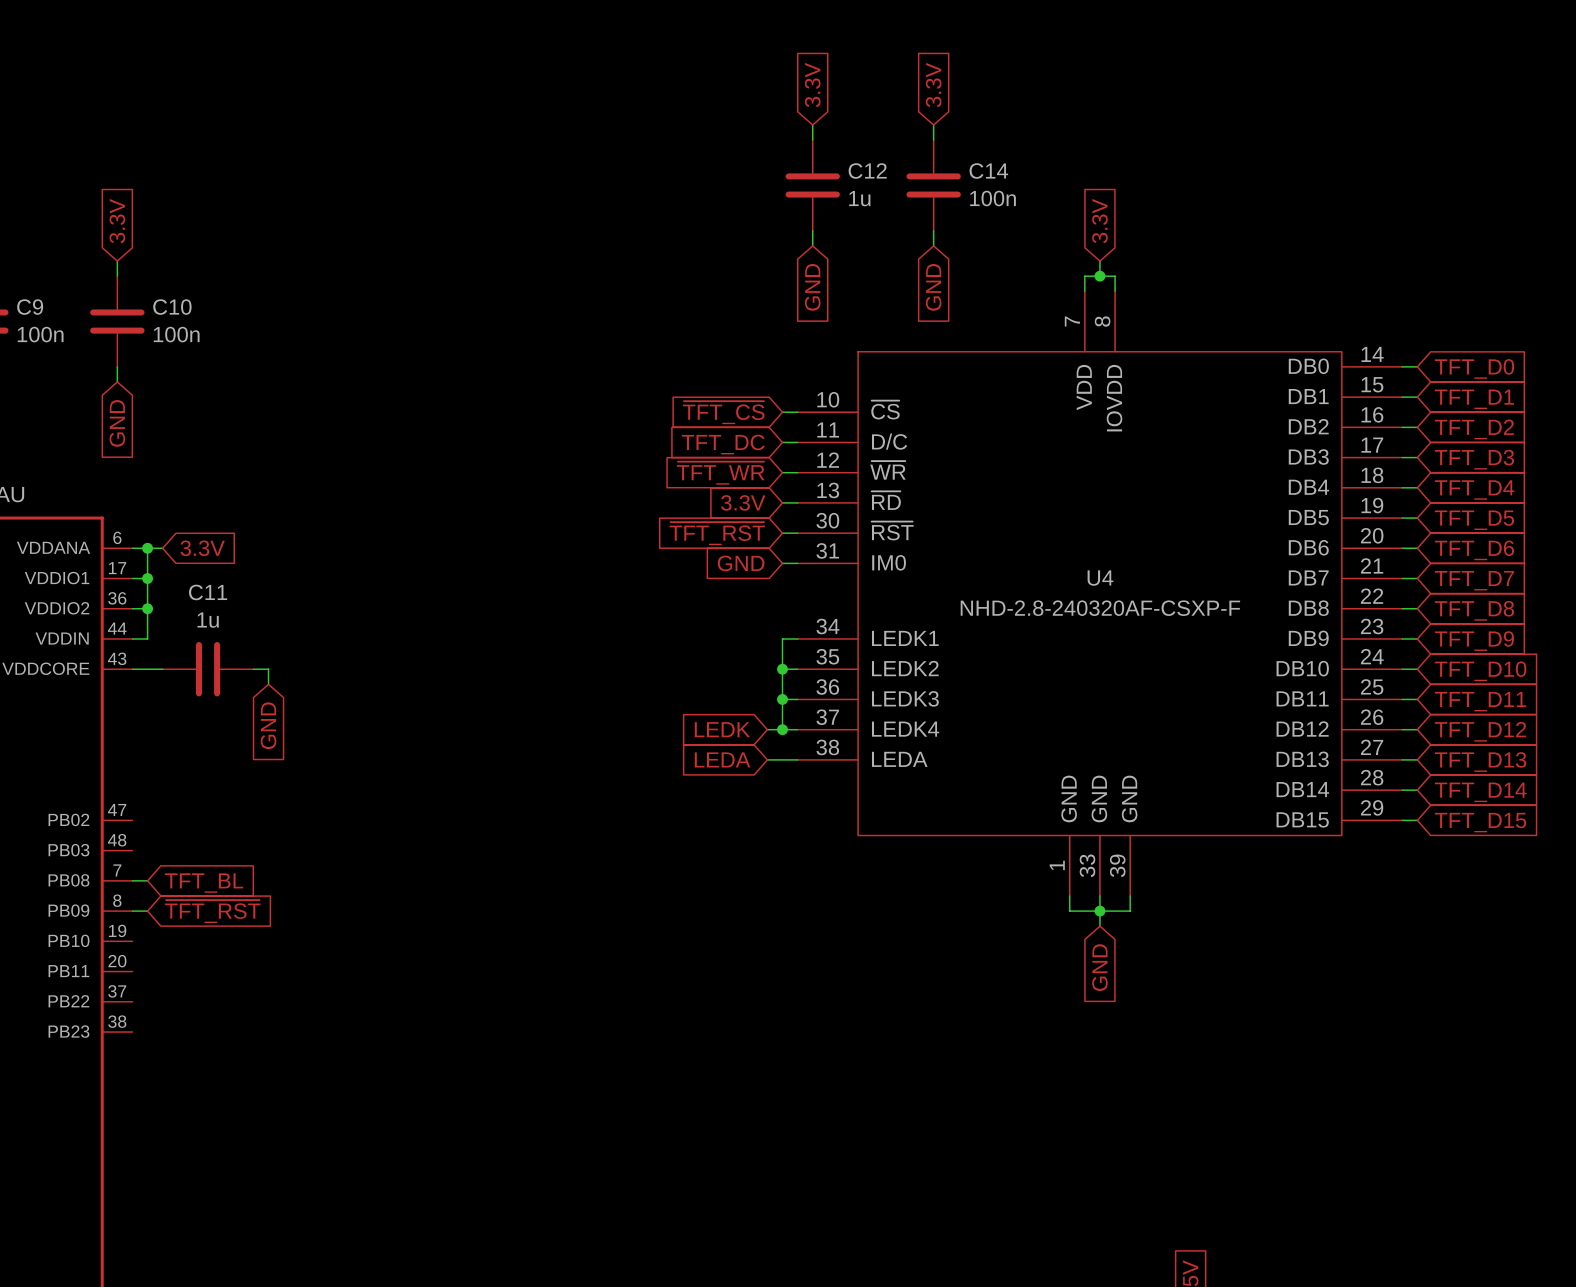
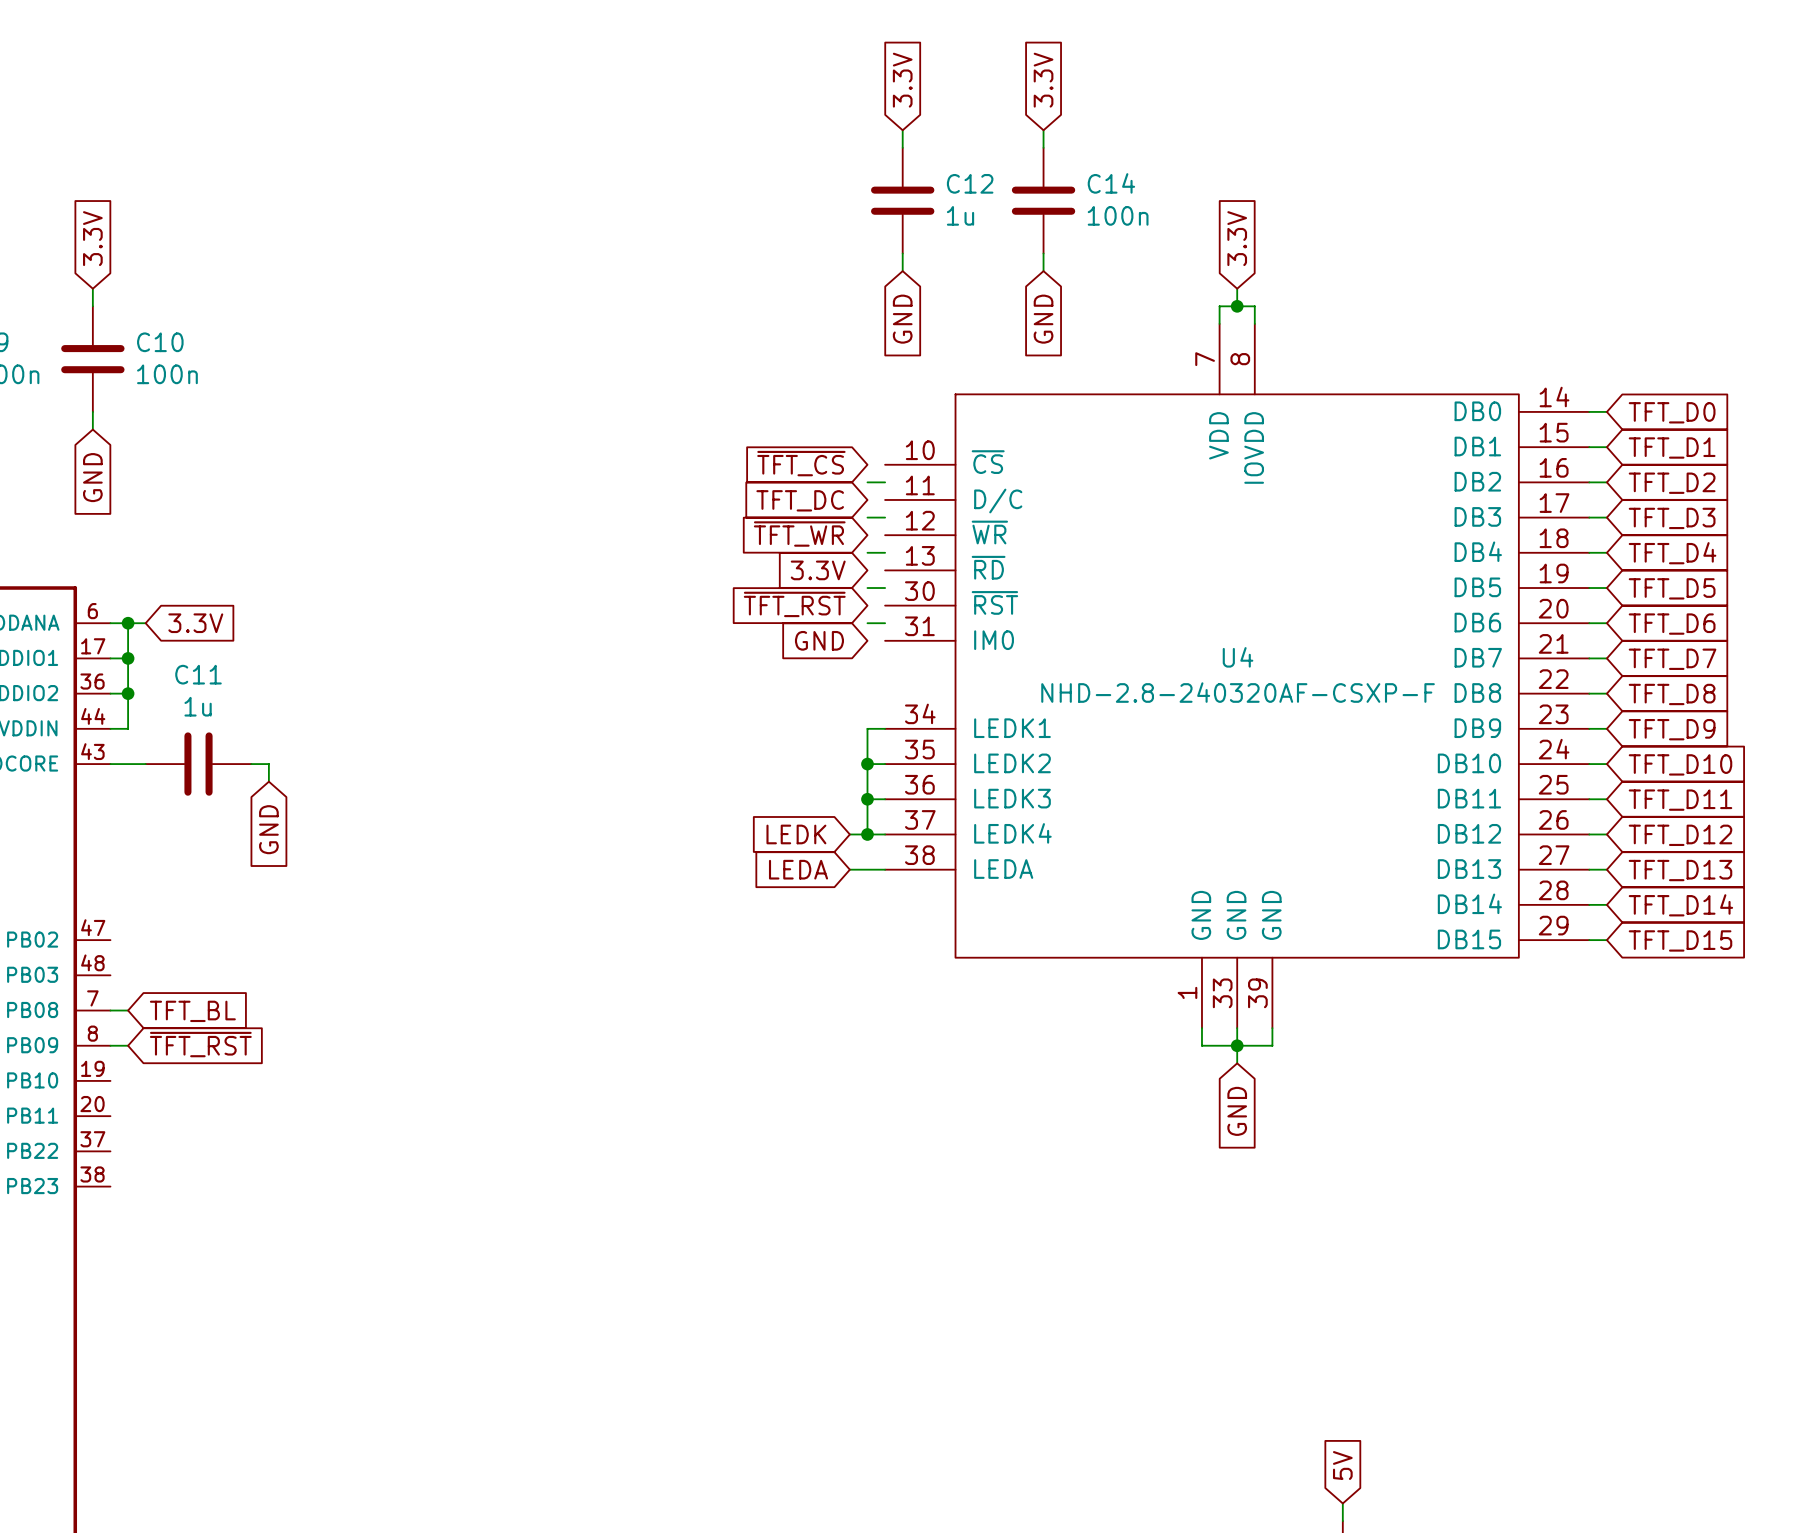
wire: (782, 412) (797, 412) -> (867, 517) (885, 517)
wire: (782, 442) (797, 442) -> (867, 482) (885, 482)
wire: (782, 472) (797, 472) -> (867, 552) (885, 552)
wire: (782, 502) (797, 502) -> (867, 588) (885, 588)
wire: (782, 533) (797, 533) -> (867, 623) (885, 623)
wire: (782, 563) (797, 563) -> none

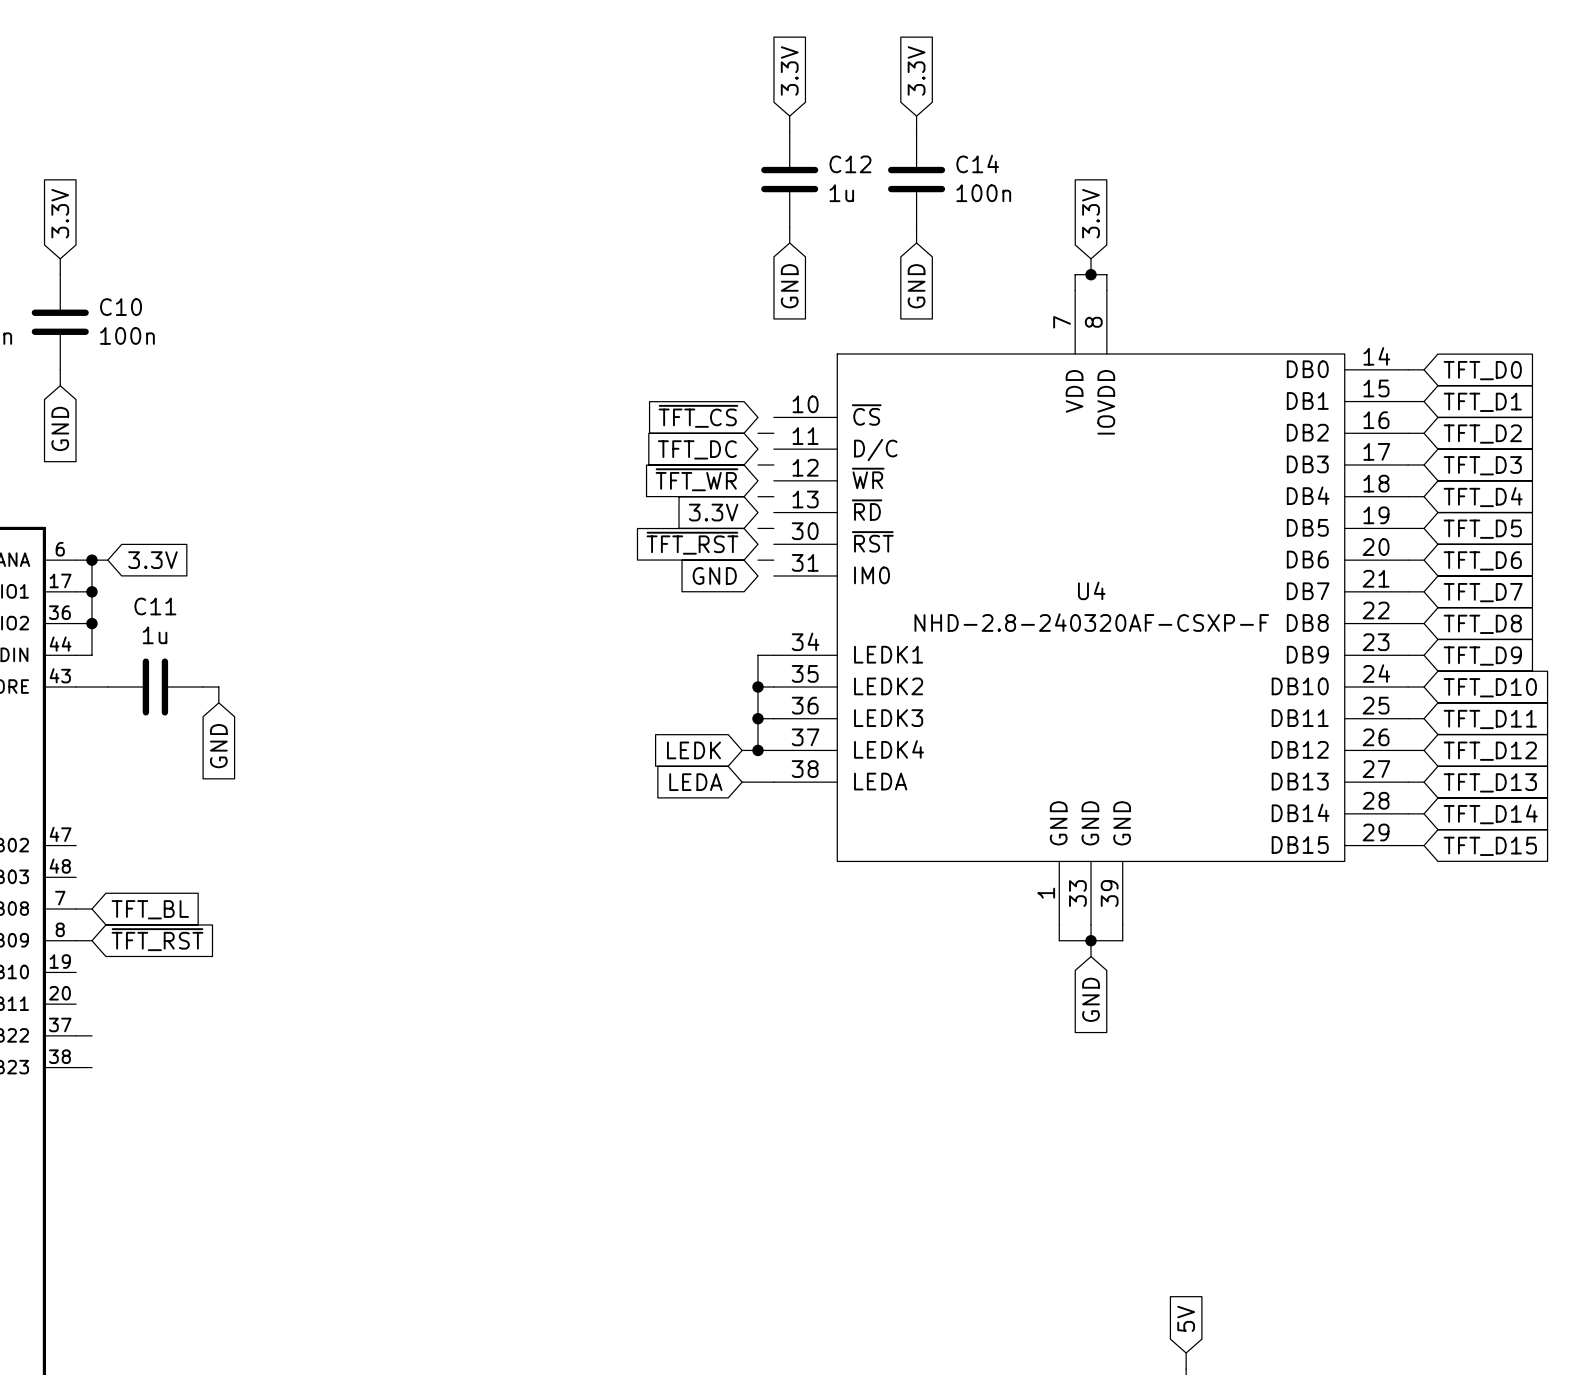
wire: none -> (76, 1035) (91, 1035)
wire: none -> (76, 1067) (91, 1067)

